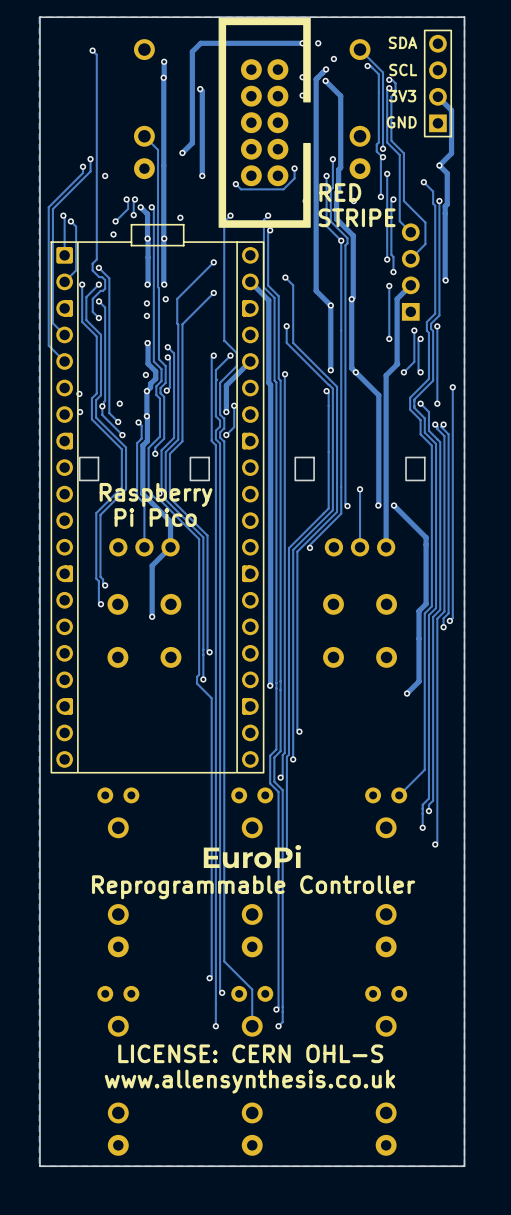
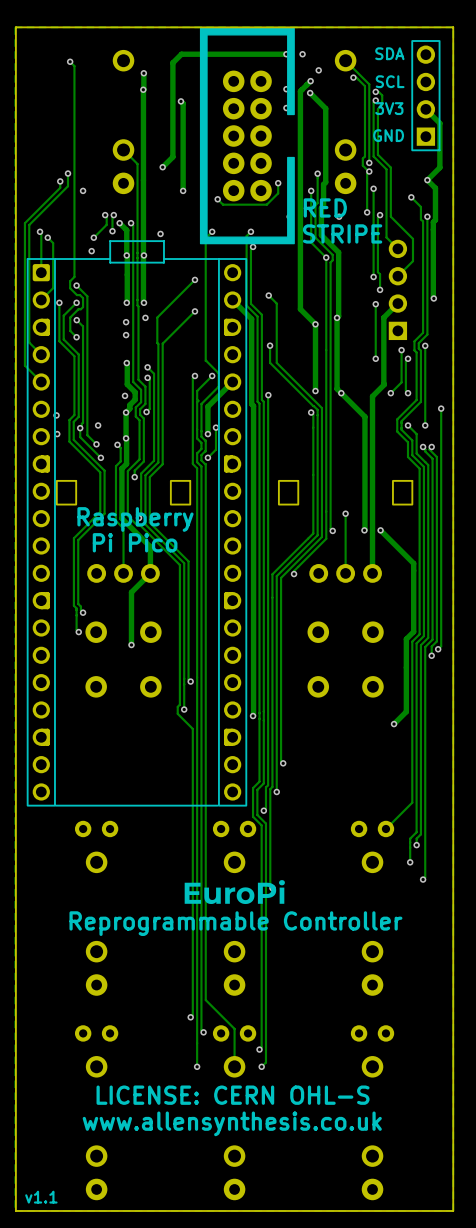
text: none -> v1.1 (41, 1197)

